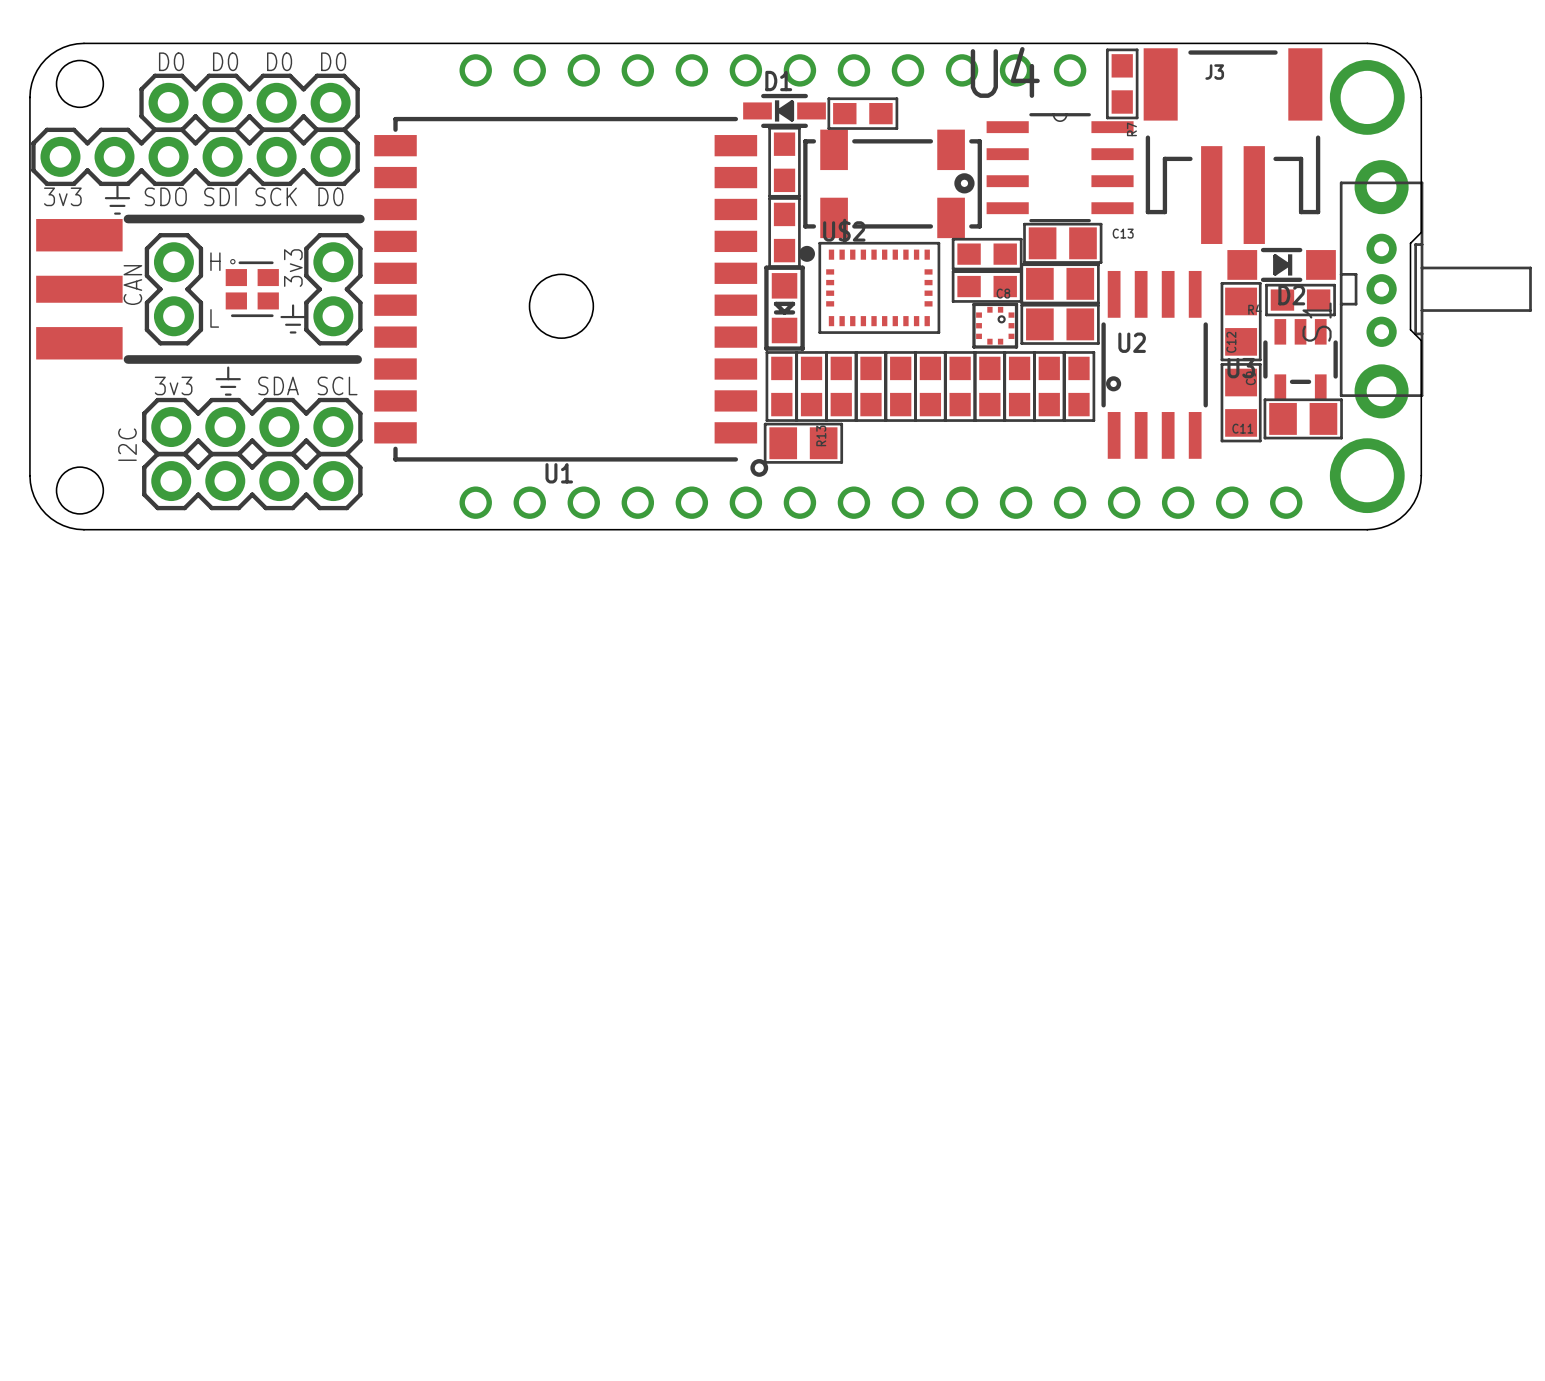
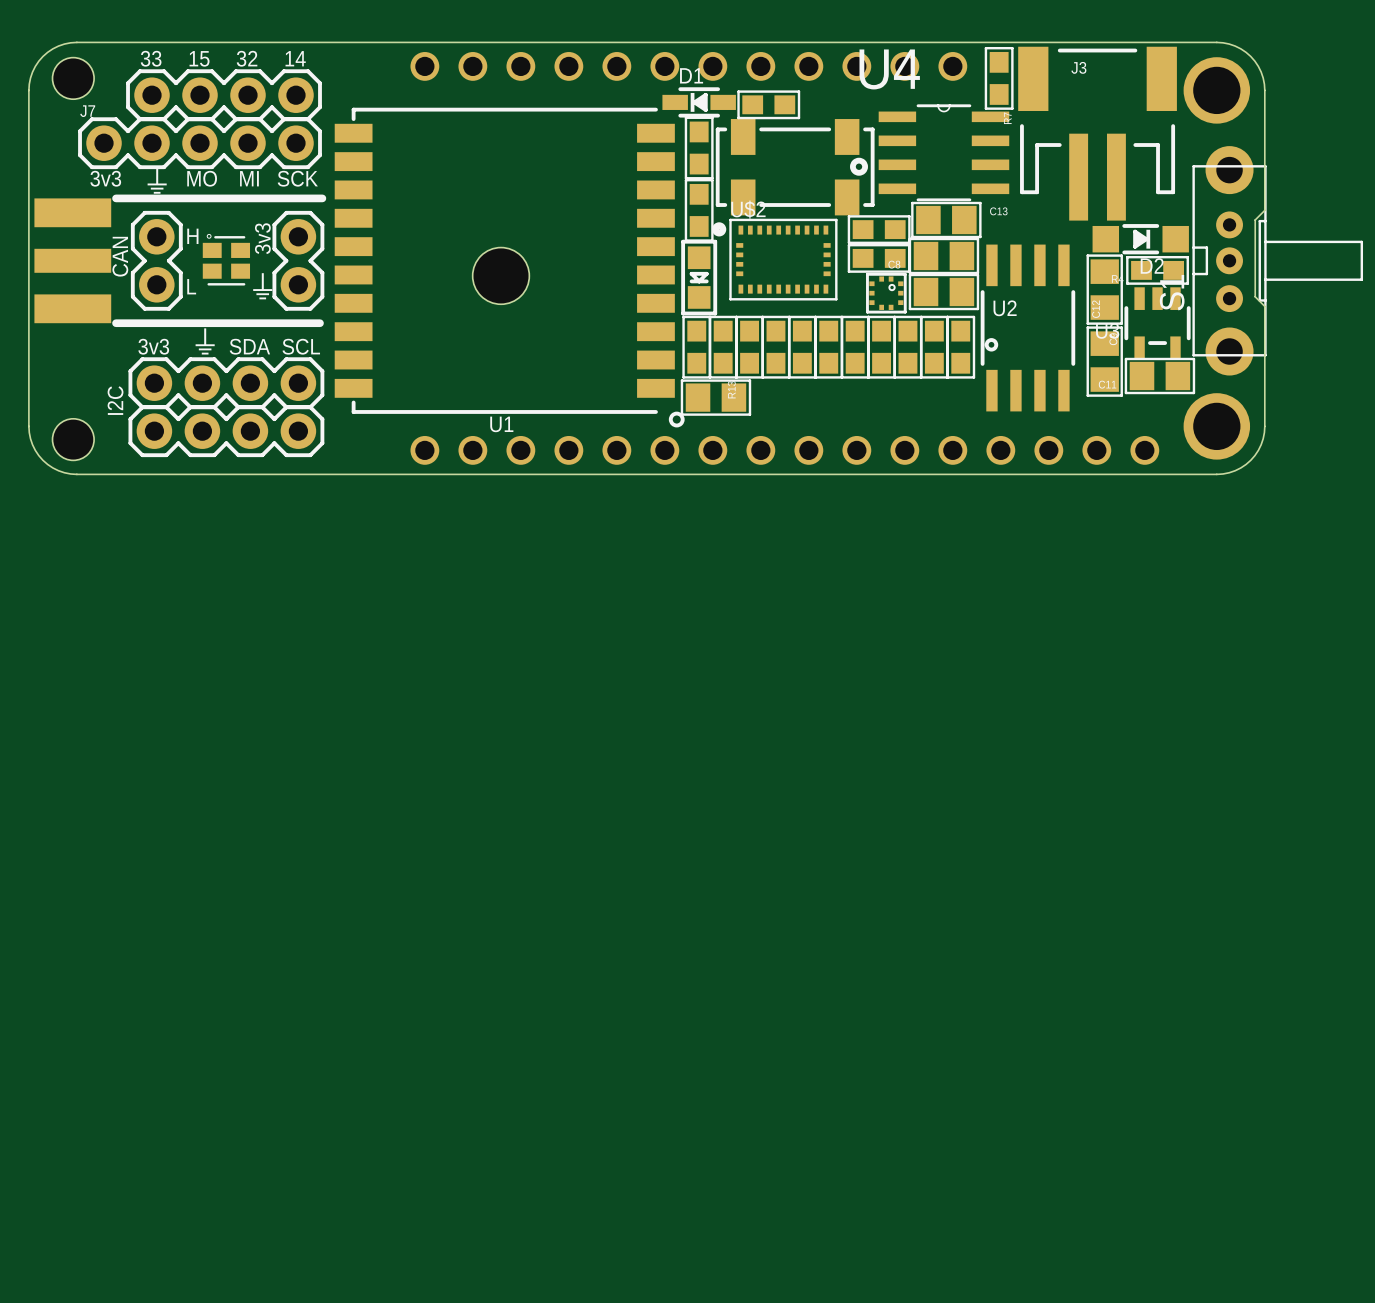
text: D0 (171, 61) -> 33 (151, 58)
text: D0 (225, 61) -> 15 (199, 58)
text: D0 (279, 61) -> 32 (247, 58)
text: D0 (333, 61) -> 14 (295, 58)
part: (195, 156) -> none
J7: none -> (200, 143)
text: 3v3 (62, 196) -> none
text: SDO (165, 196) -> ⏚ (157, 180)
text: SDI (220, 196) -> MO (202, 178)
text: SCK (276, 196) -> MI (249, 178)
text: D0 (330, 196) -> SCK (297, 178)
text: ⏚ (117, 200) -> 3v3 (105, 178)

